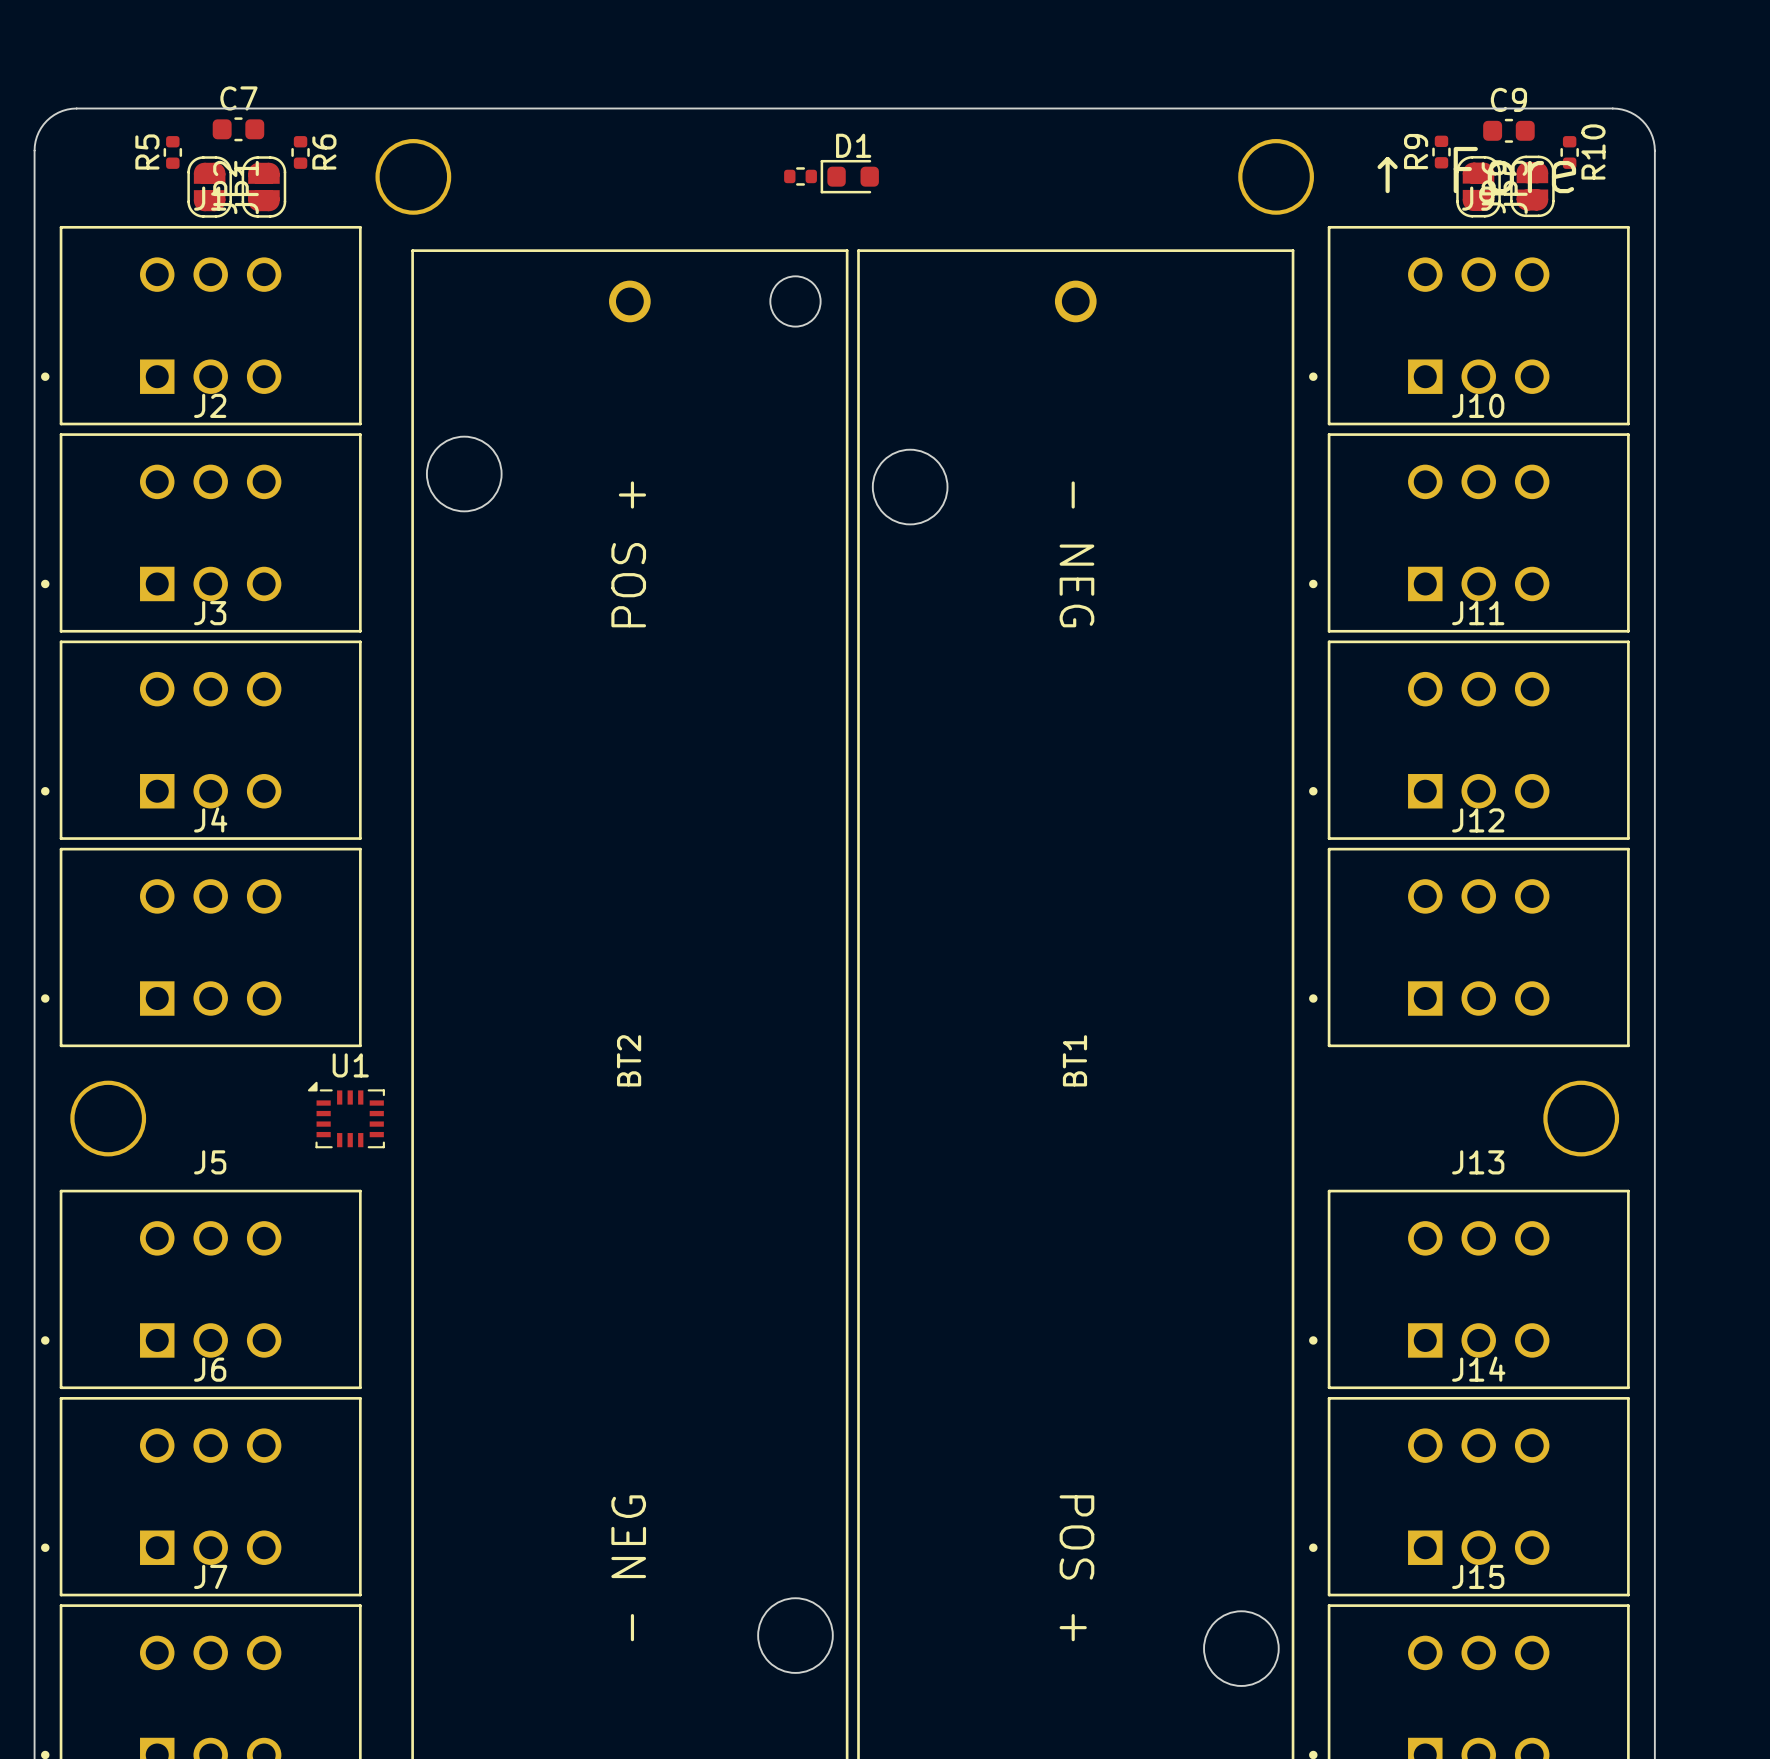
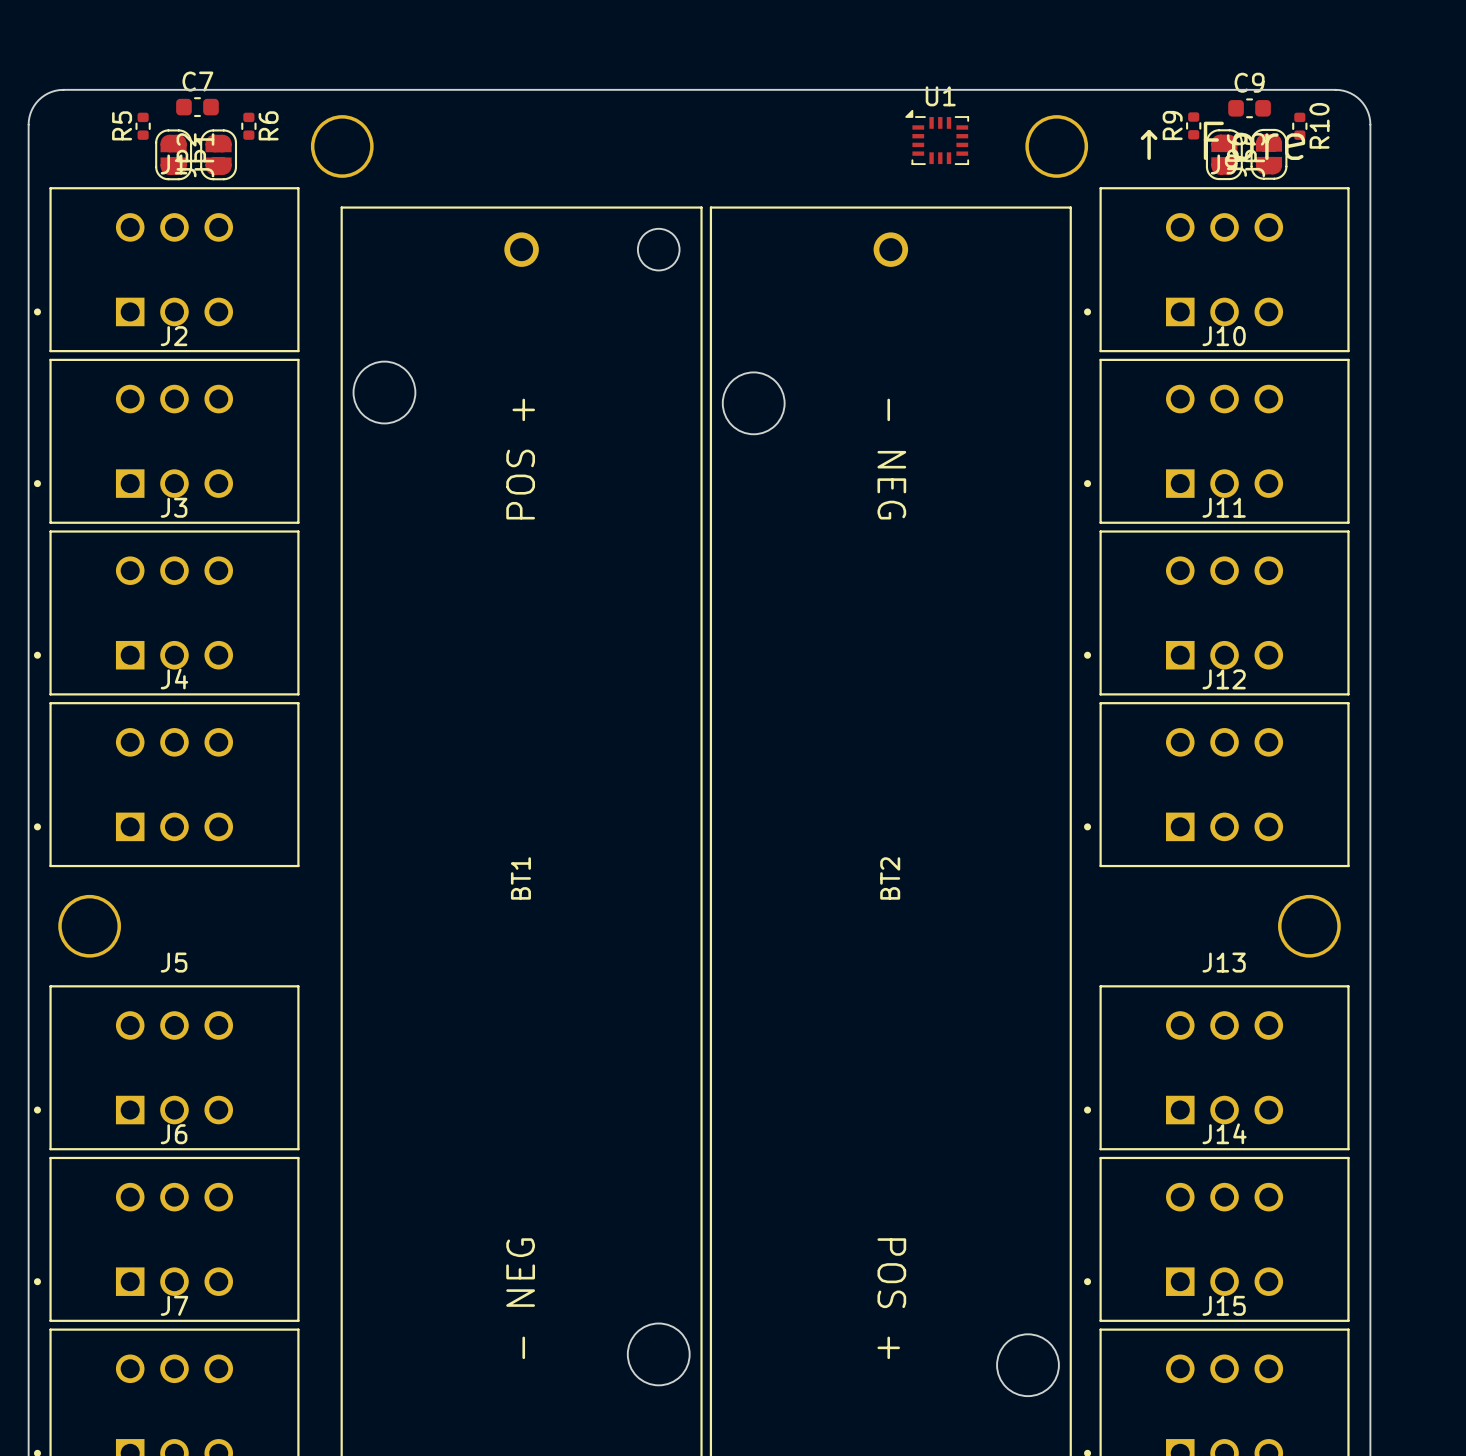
part: (800, 176) -> none
D1: (849, 176) -> none
BT2 name: BT2 (629, 1060) -> BT1 (520, 878)
BT1 name: BT1 (1074, 1060) -> BT2 (890, 878)
U1 position: (346, 1115) -> (937, 137)

